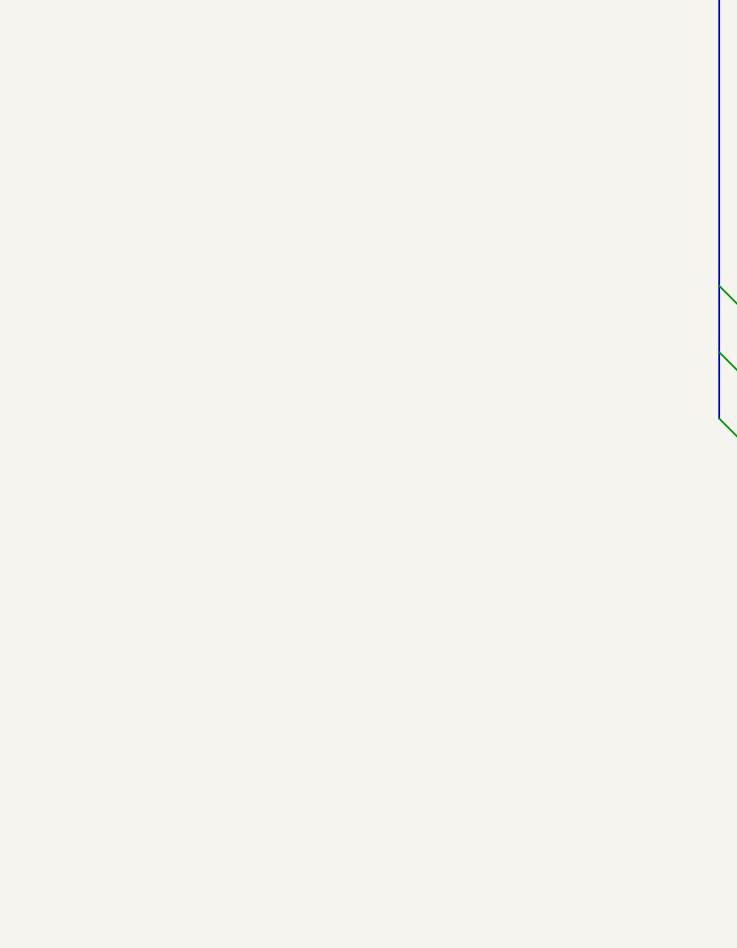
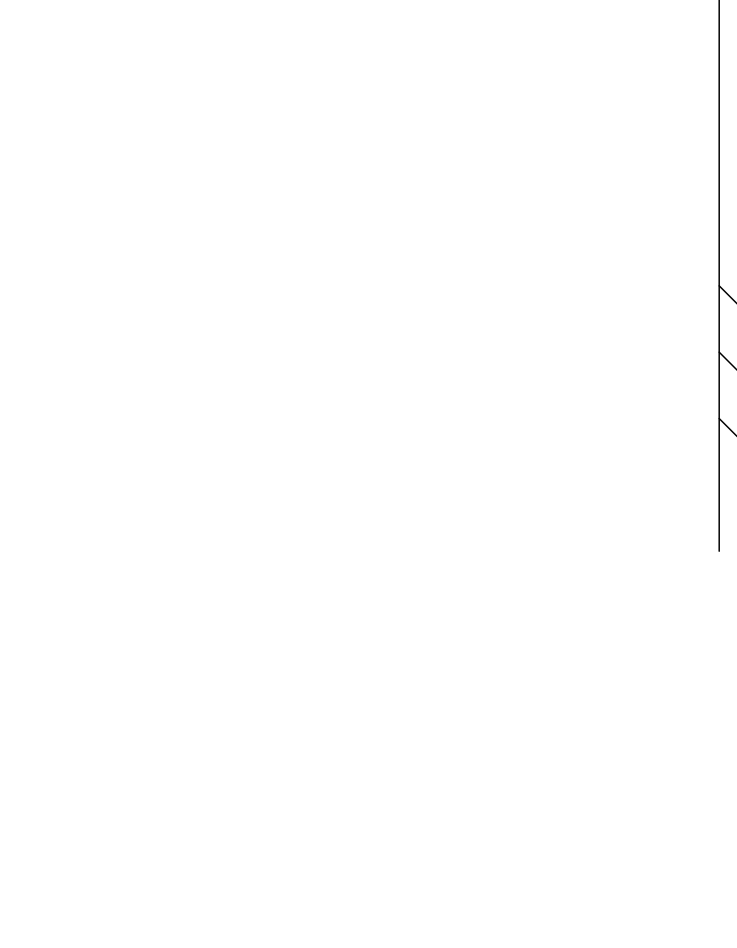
bus: none -> (719, 418) (719, 551)

